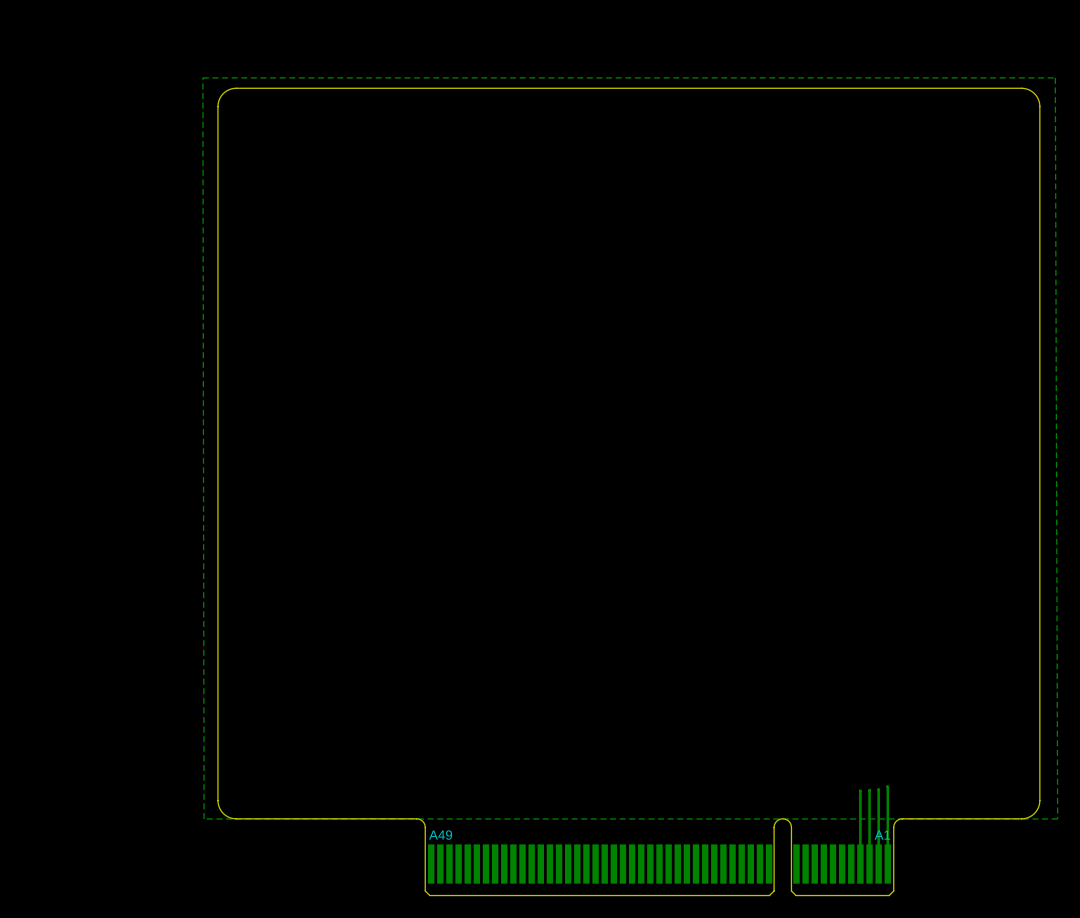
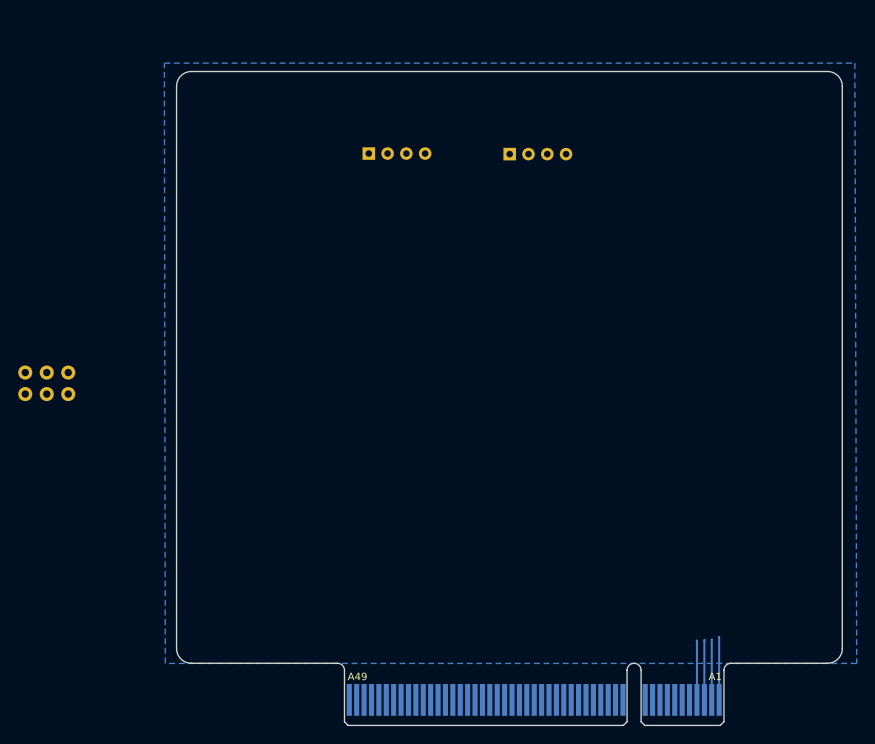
part: none -> (396, 153)
part: none -> (537, 154)
part: none -> (25, 372)
part: none -> (46, 372)
part: none -> (68, 372)
part: none -> (25, 394)
part: none -> (46, 394)
part: none -> (68, 394)

